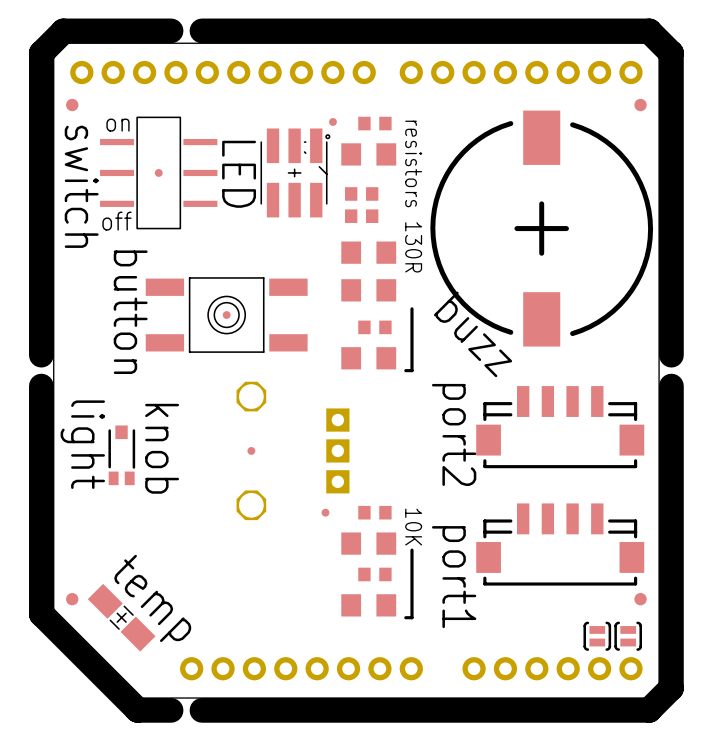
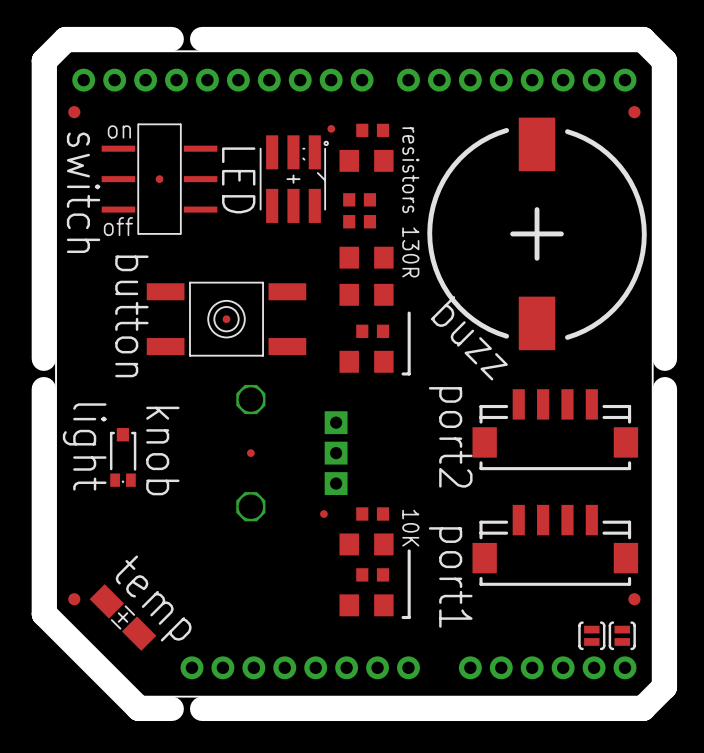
part footprint: [108, 425, 136, 486] -> [109, 428, 137, 487]

